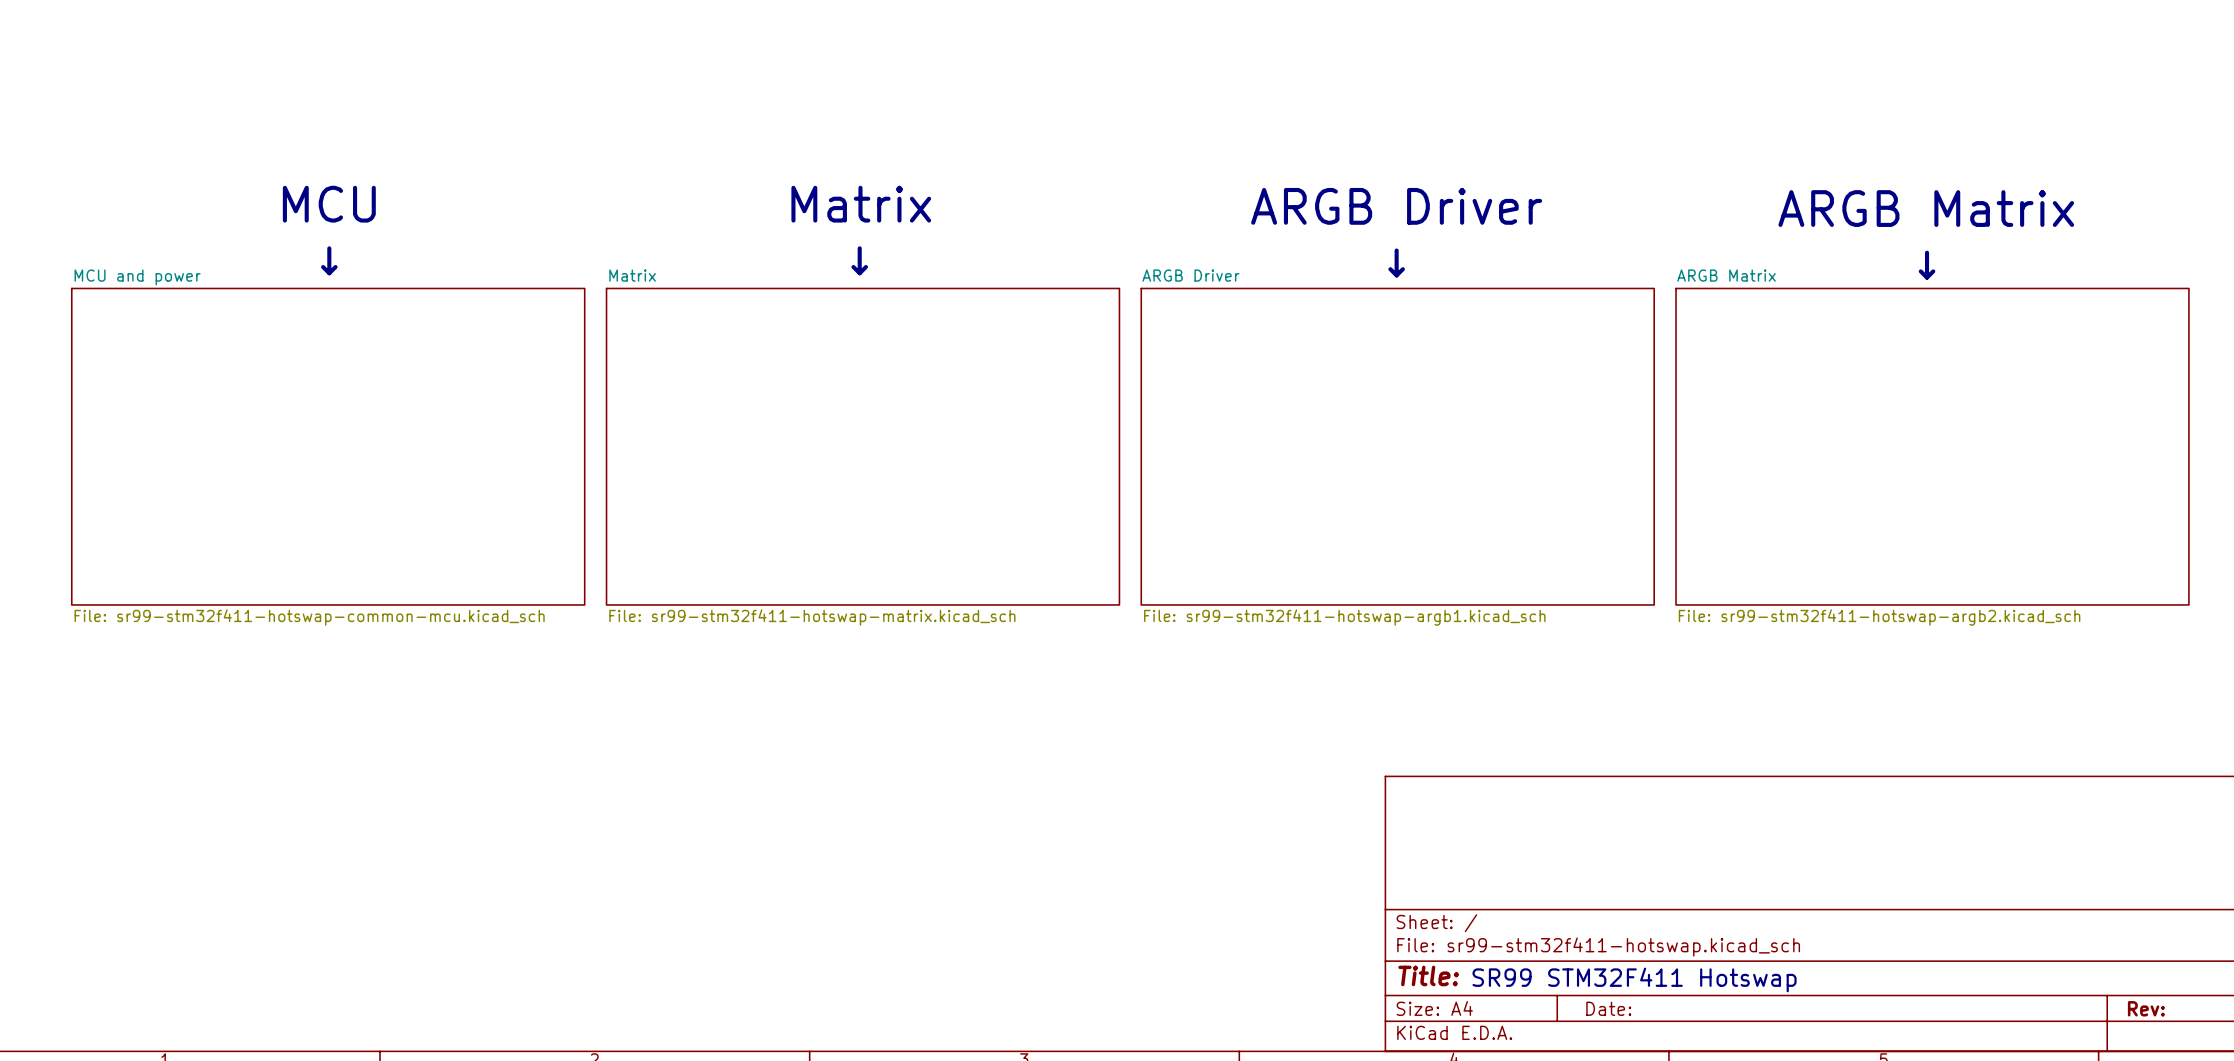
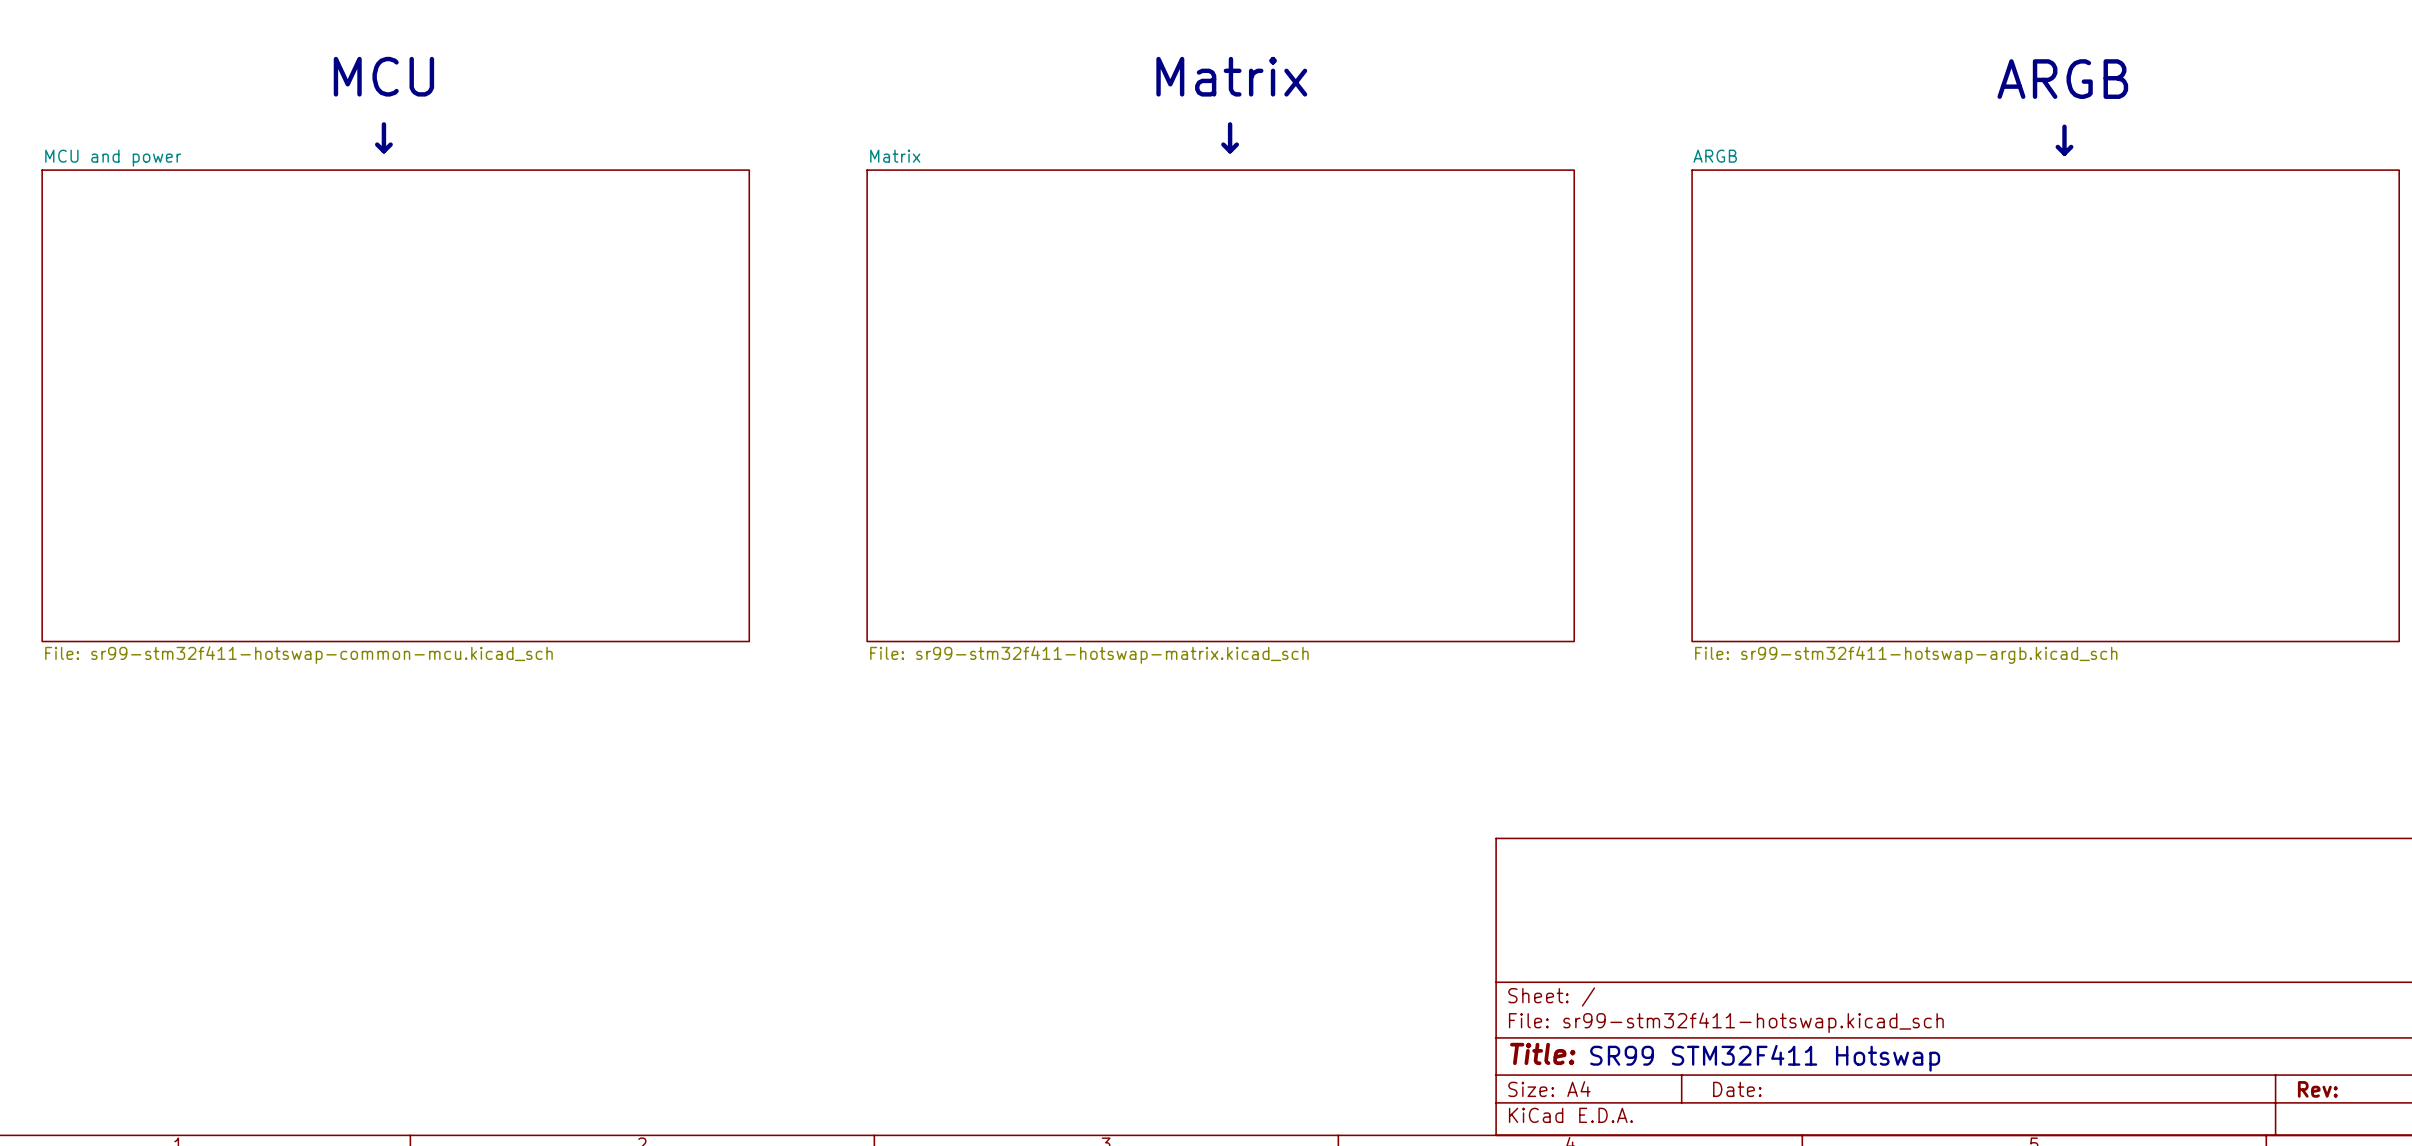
text: none -> Matrix (1231, 76)
text: none -> ARGB (2062, 79)
text: none -> ↓ (1230, 137)
text position: MCU (329, 204) -> MCU (383, 76)
text: Matrix (861, 204) -> none
text: ARGB Driver (1396, 206) -> none
text: ARGB Matrix (1926, 208) -> none
text position: ↓ (329, 260) -> ↓ (383, 137)
text: ↓ (859, 260) -> none
text: ↓ (1396, 262) -> none
text position: ↓ (1927, 265) -> ↓ (2064, 140)
sheet MCU and power: none -> File: sr99-stm32f411-hotswap-common-mcu.kicad_sch (395, 405)
sheet Matrix: none -> File: sr99-stm32f411-hotswap-matrix.kicad_sch (1220, 405)
sheet ARGB: none -> File: sr99-stm32f411-hotswap-argb.kicad_sch (2045, 405)
sheet MCU and power: File: sr99-stm32f411-hotswap-common-mcu.kicad_sch (328, 446) -> none
sheet Matrix: File: sr99-stm32f411-hotswap-matrix.kicad_sch (862, 446) -> none
sheet ARGB Driver: File: sr99-stm32f411-hotswap-argb1.kicad_sch (1397, 446) -> none
sheet ARGB Matrix: File: sr99-stm32f411-hotswap-argb2.kicad_sch (1932, 446) -> none

